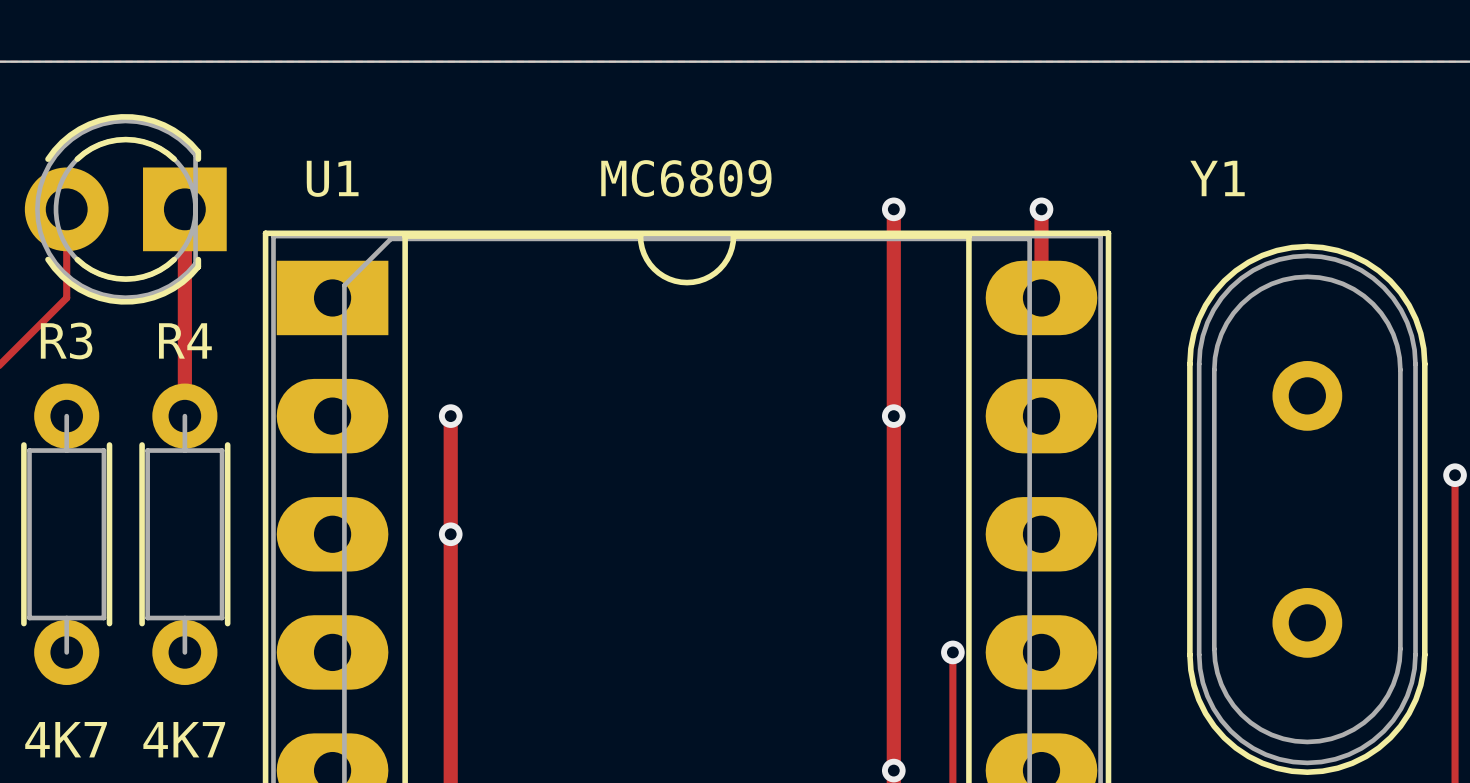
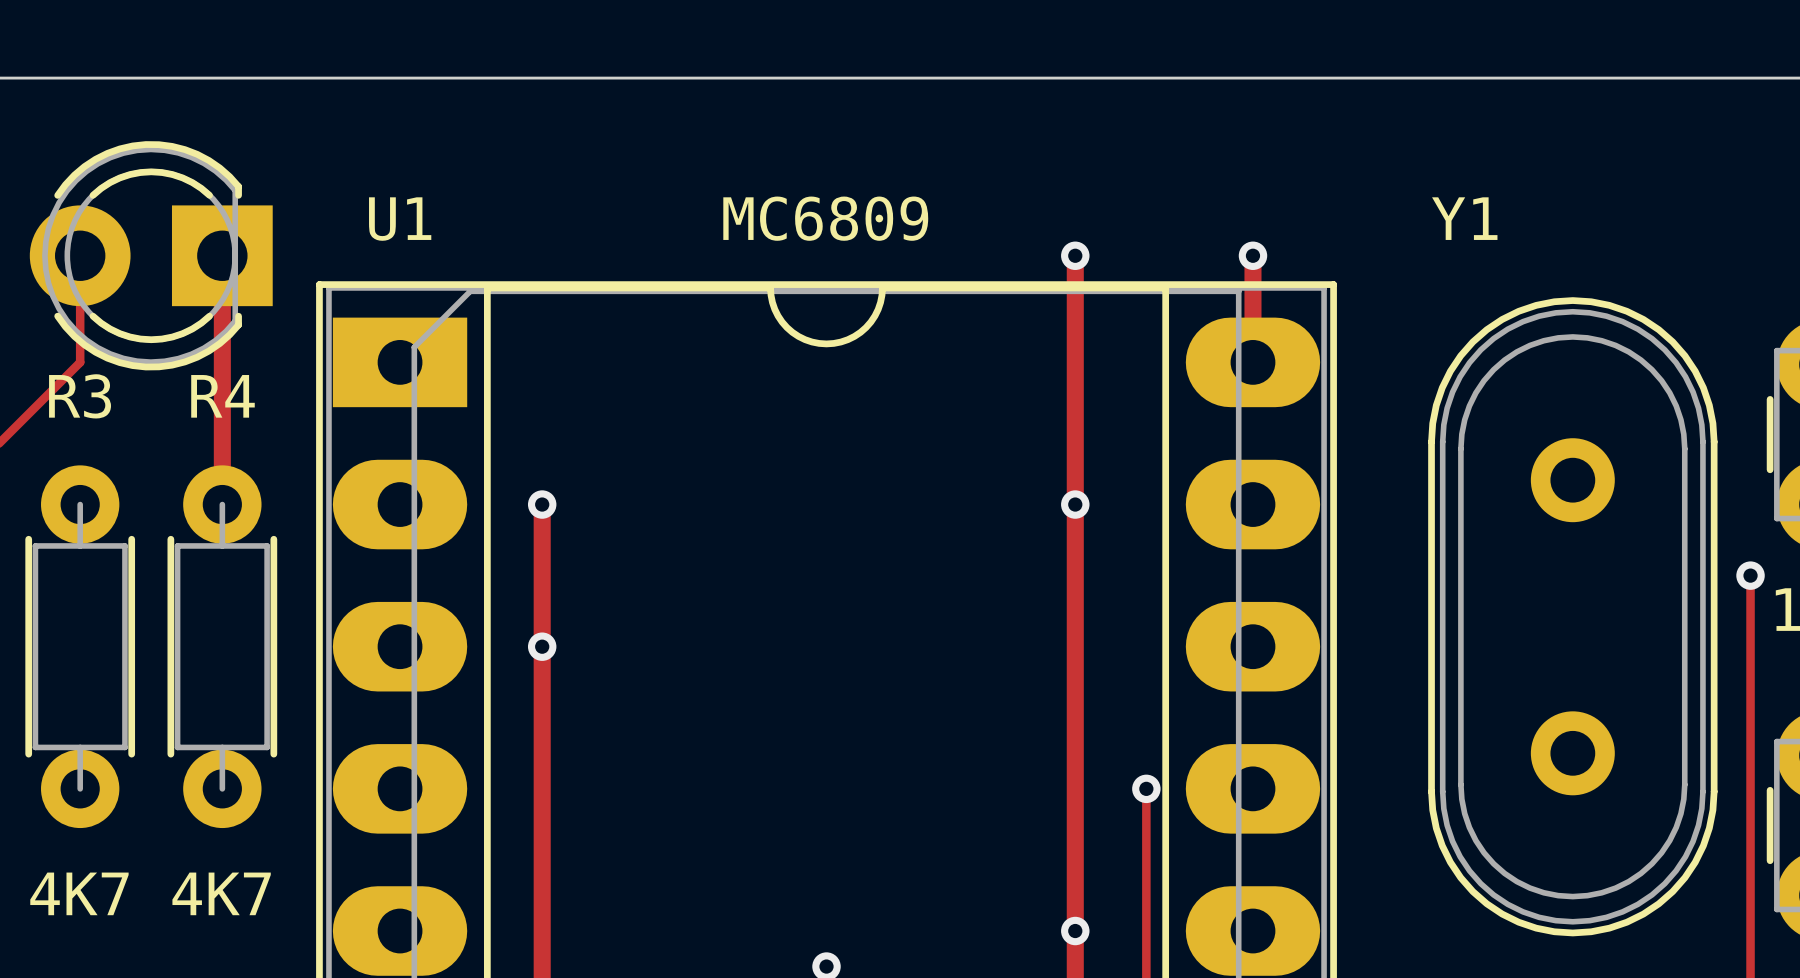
R3 name position: R3 (66, 340) -> R3 (80, 396)
R4 name position: R4 (185, 340) -> R4 (222, 396)

